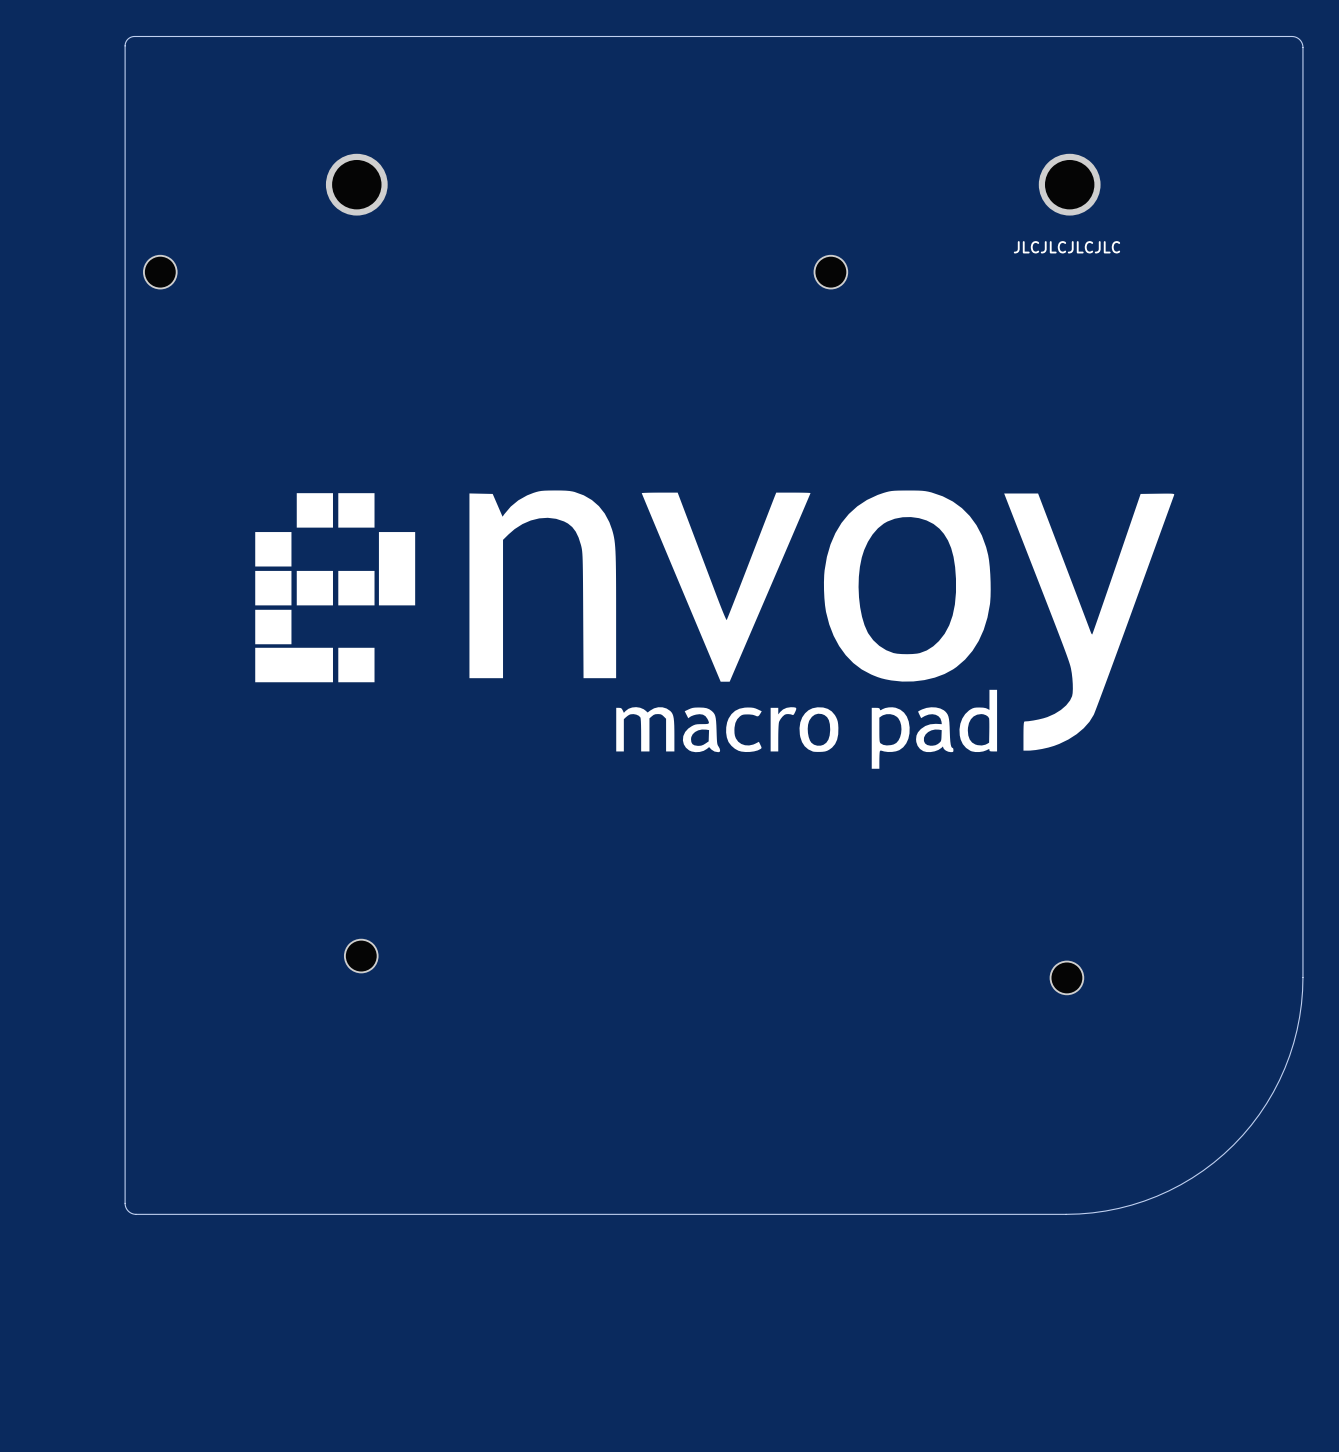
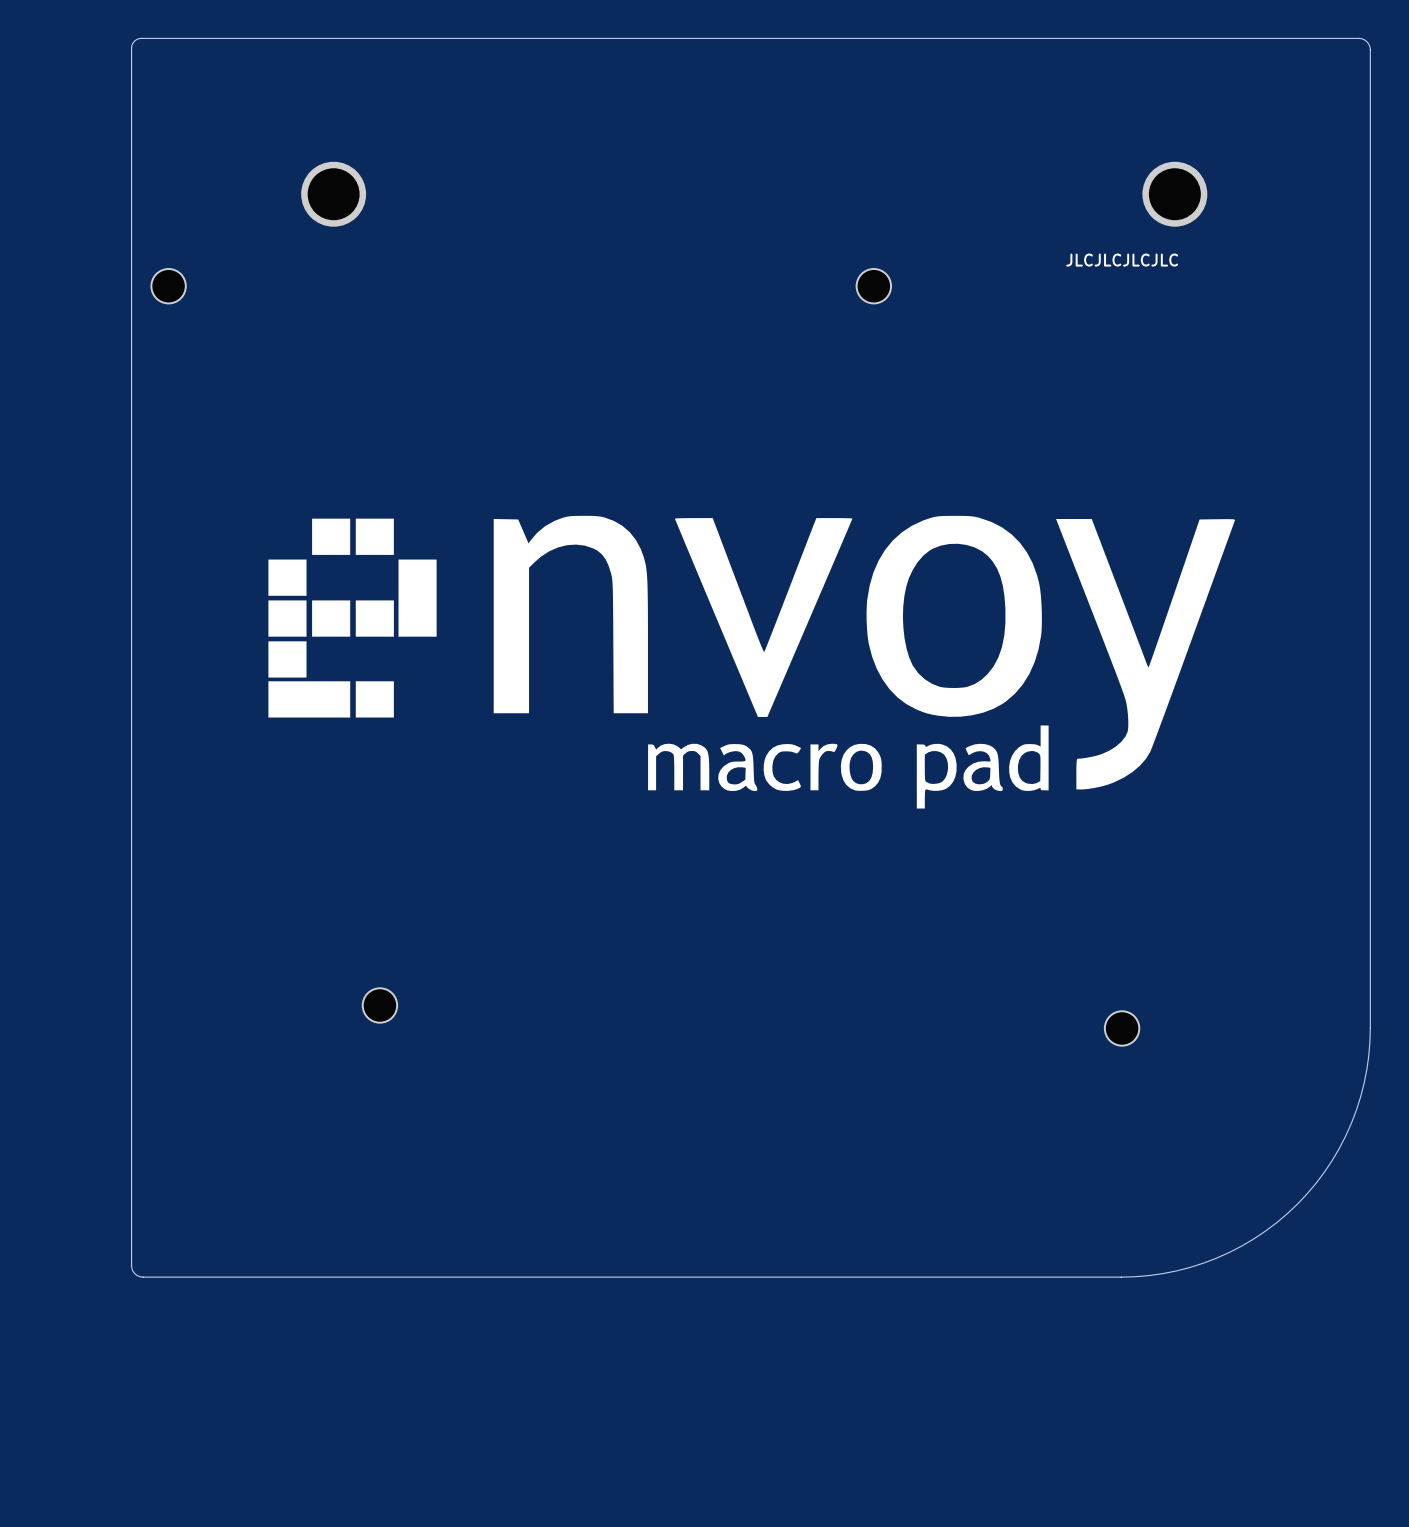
part position: (356, 184) -> (333, 194)
part position: (1069, 184) -> (1174, 194)

